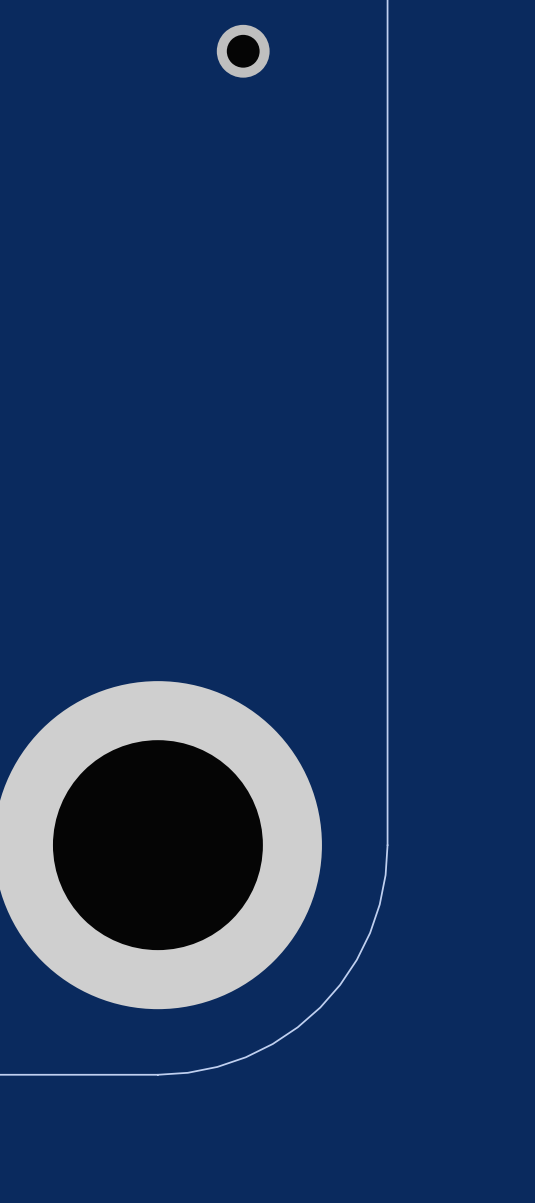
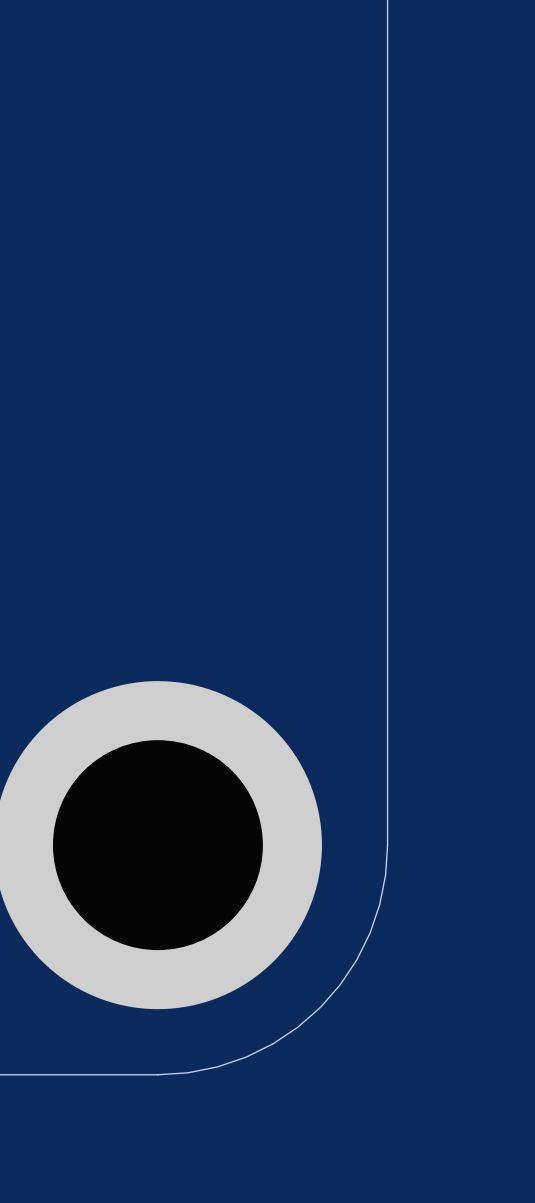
via: (243, 51) -> none

